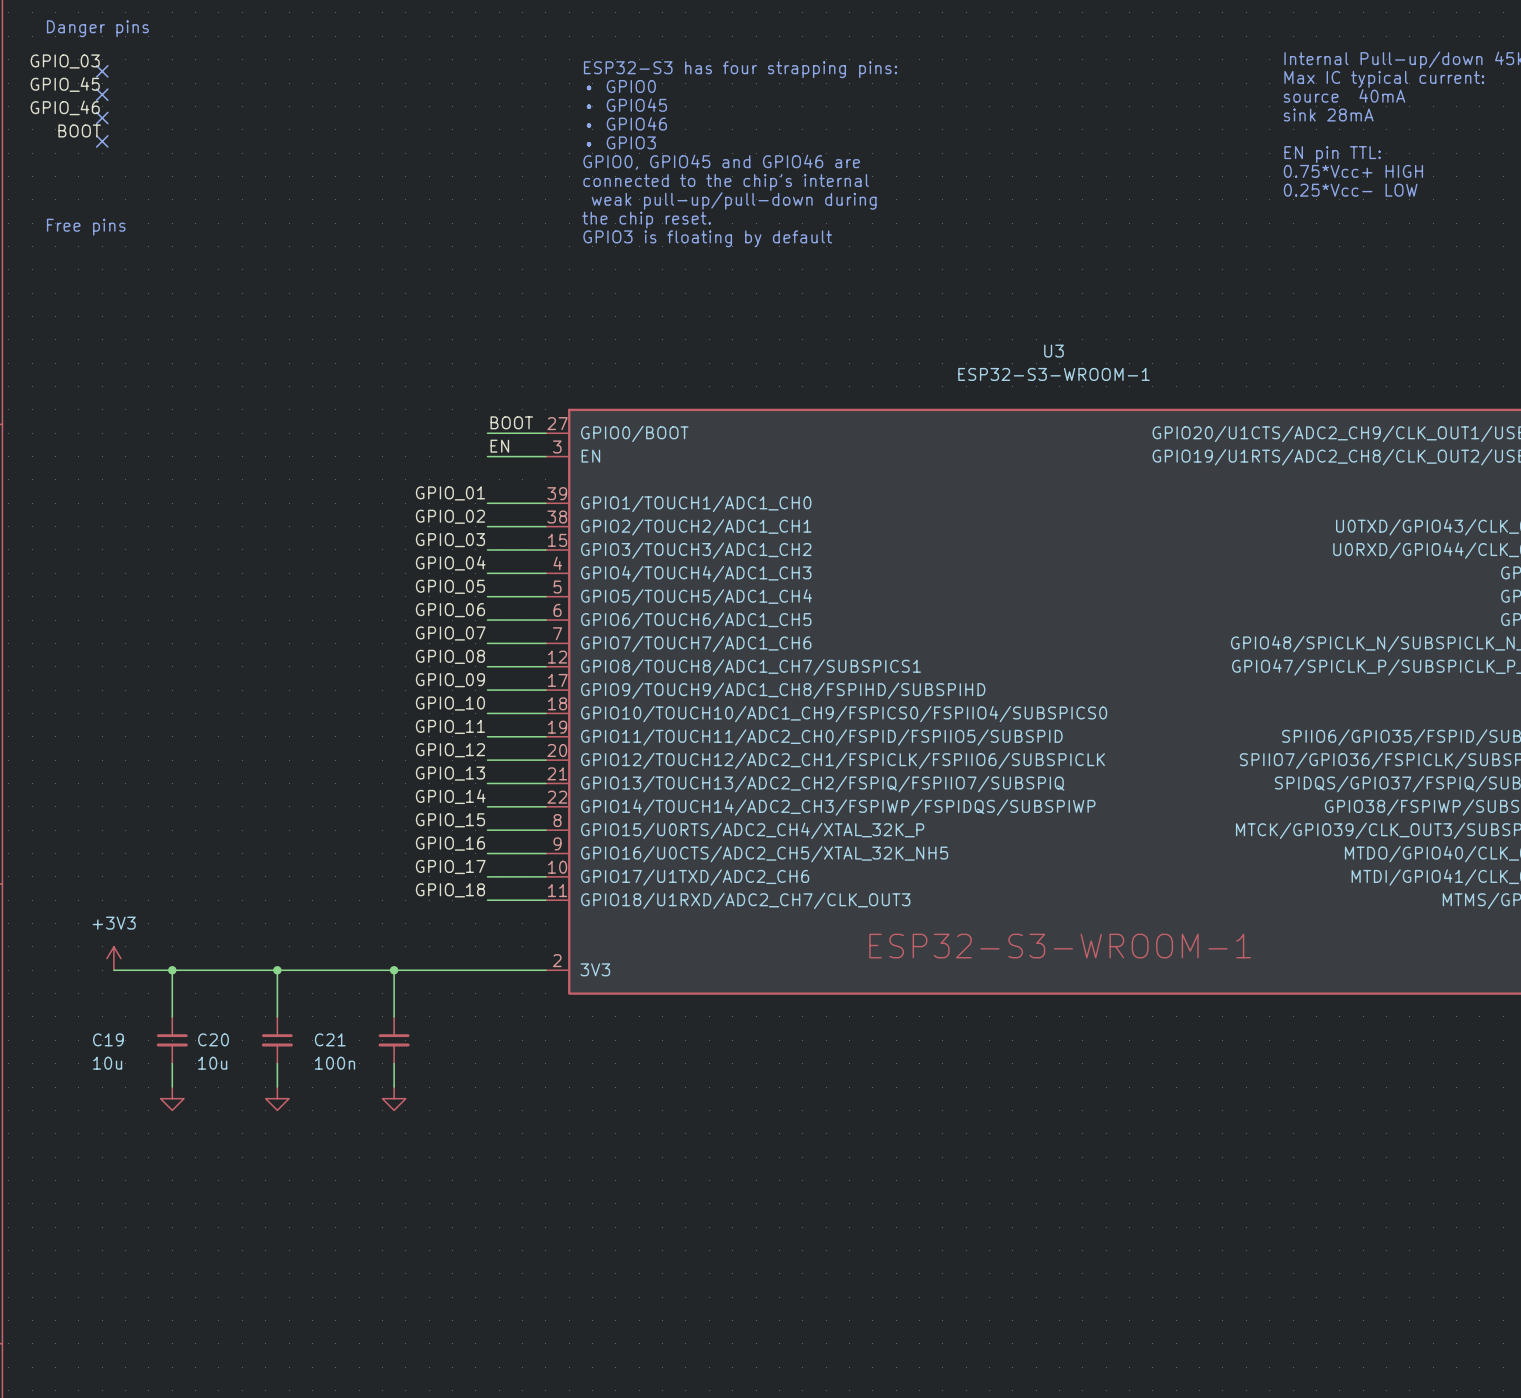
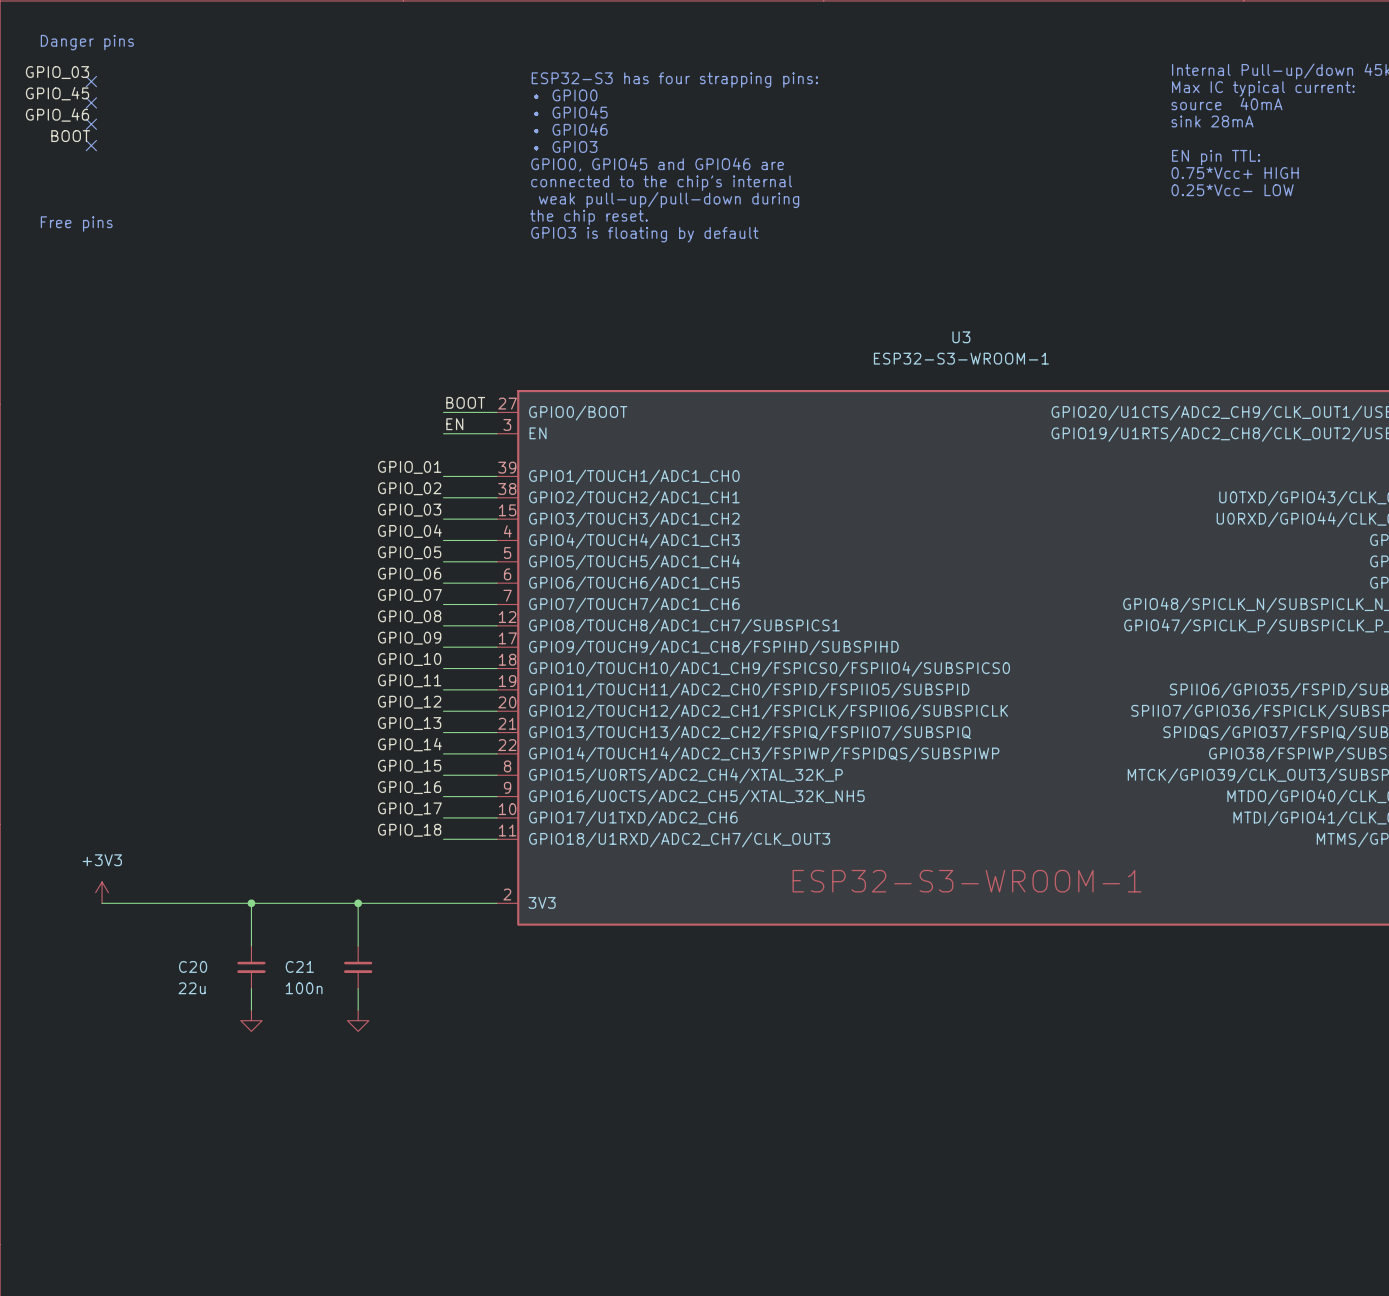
wire: (172, 970) (172, 1016) -> none
junction: (172, 970) -> none
C19: 10u (172, 1040) -> none
wire: (172, 1063) (172, 1087) -> none
C20 value: 10u (212, 1063) -> 22u (192, 988)
power symbol: (172, 1098) -> none

